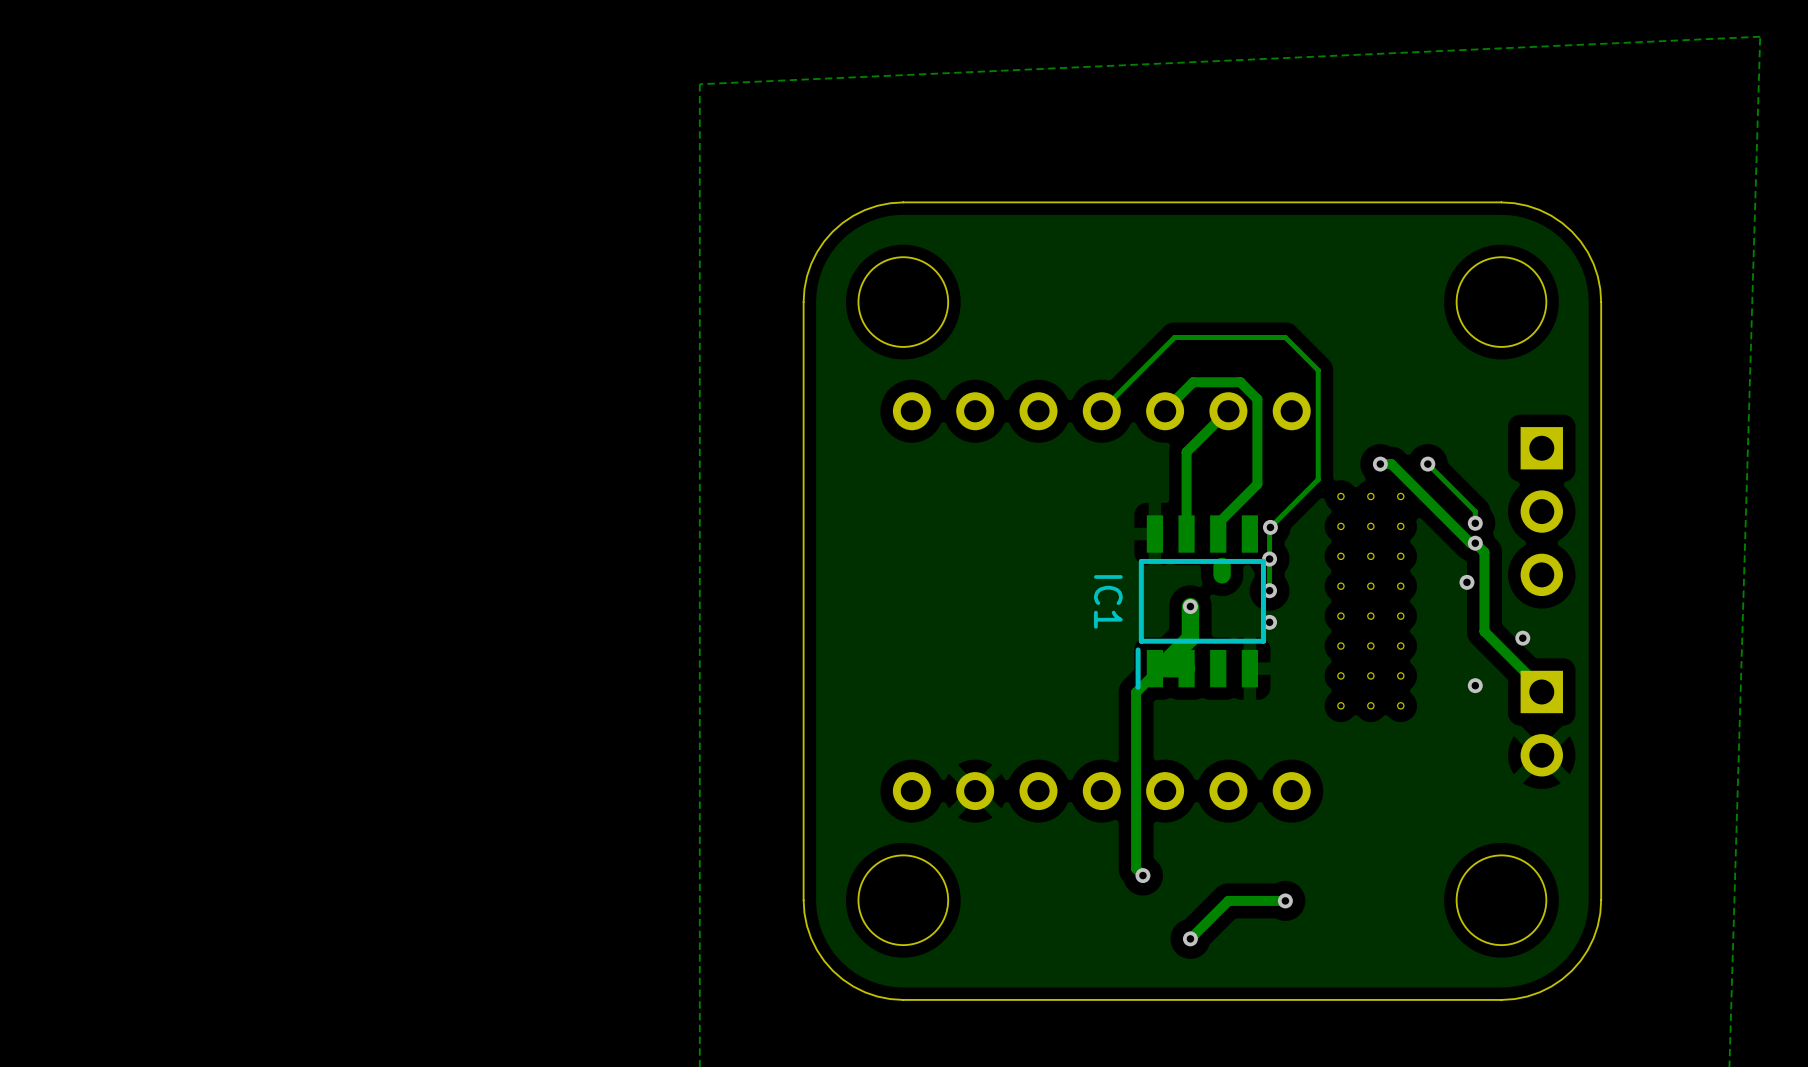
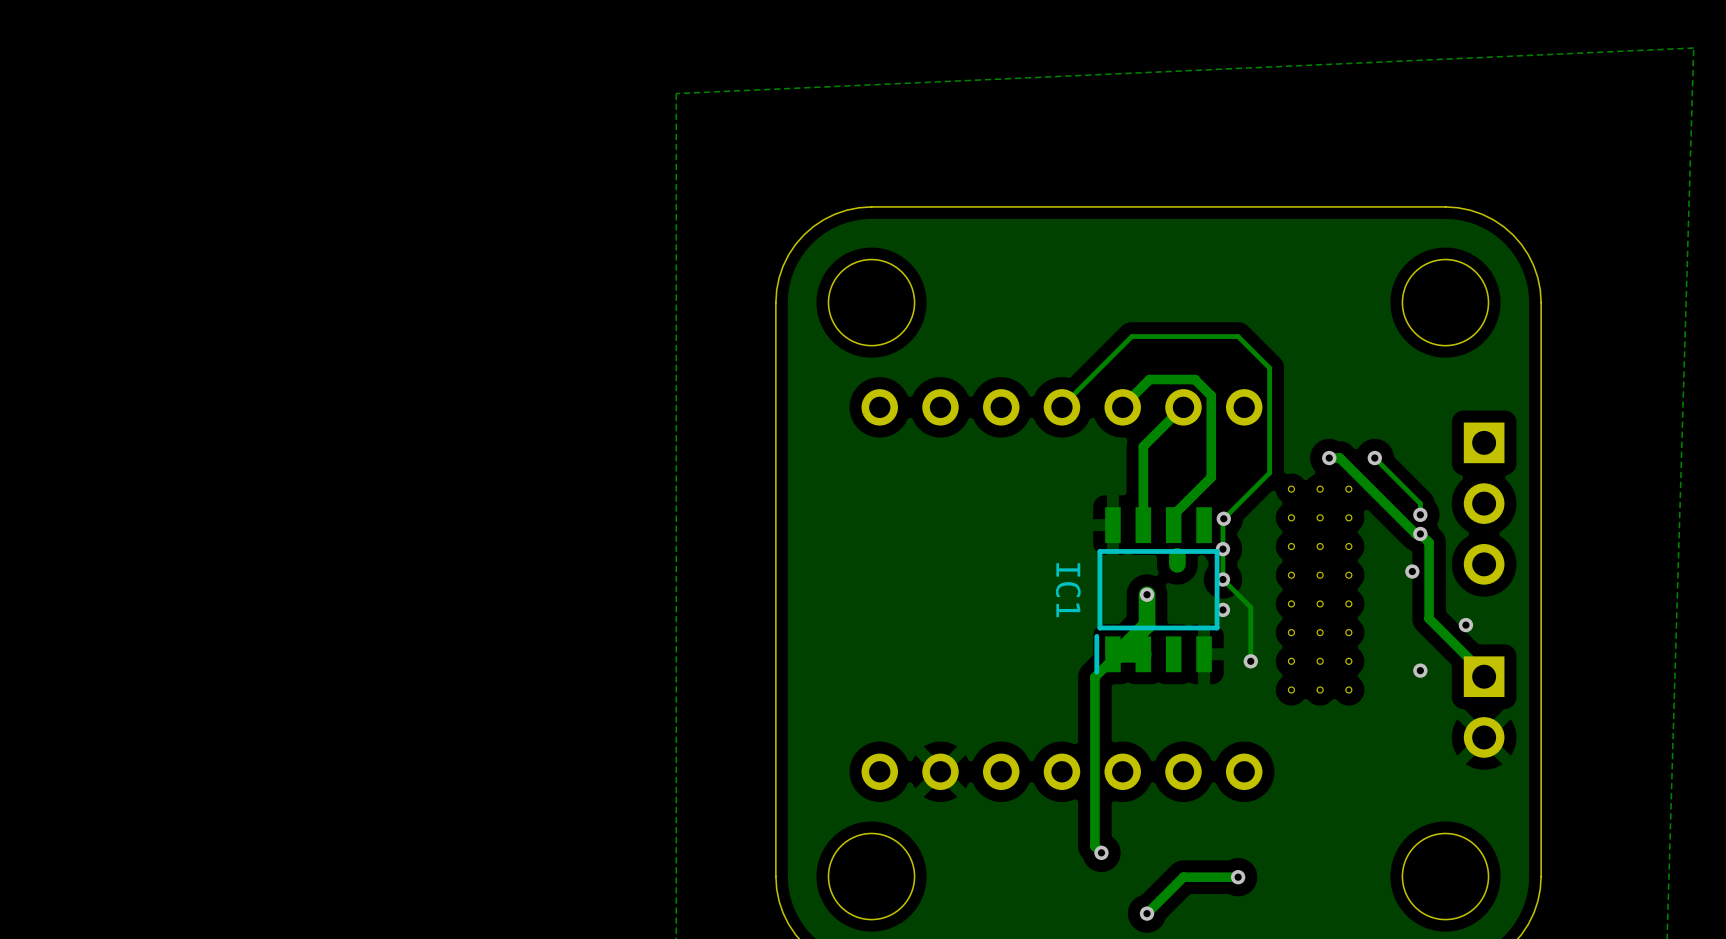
track: none -> (1222, 579) (1250, 607) (1250, 661)
via: none -> (1250, 661)

